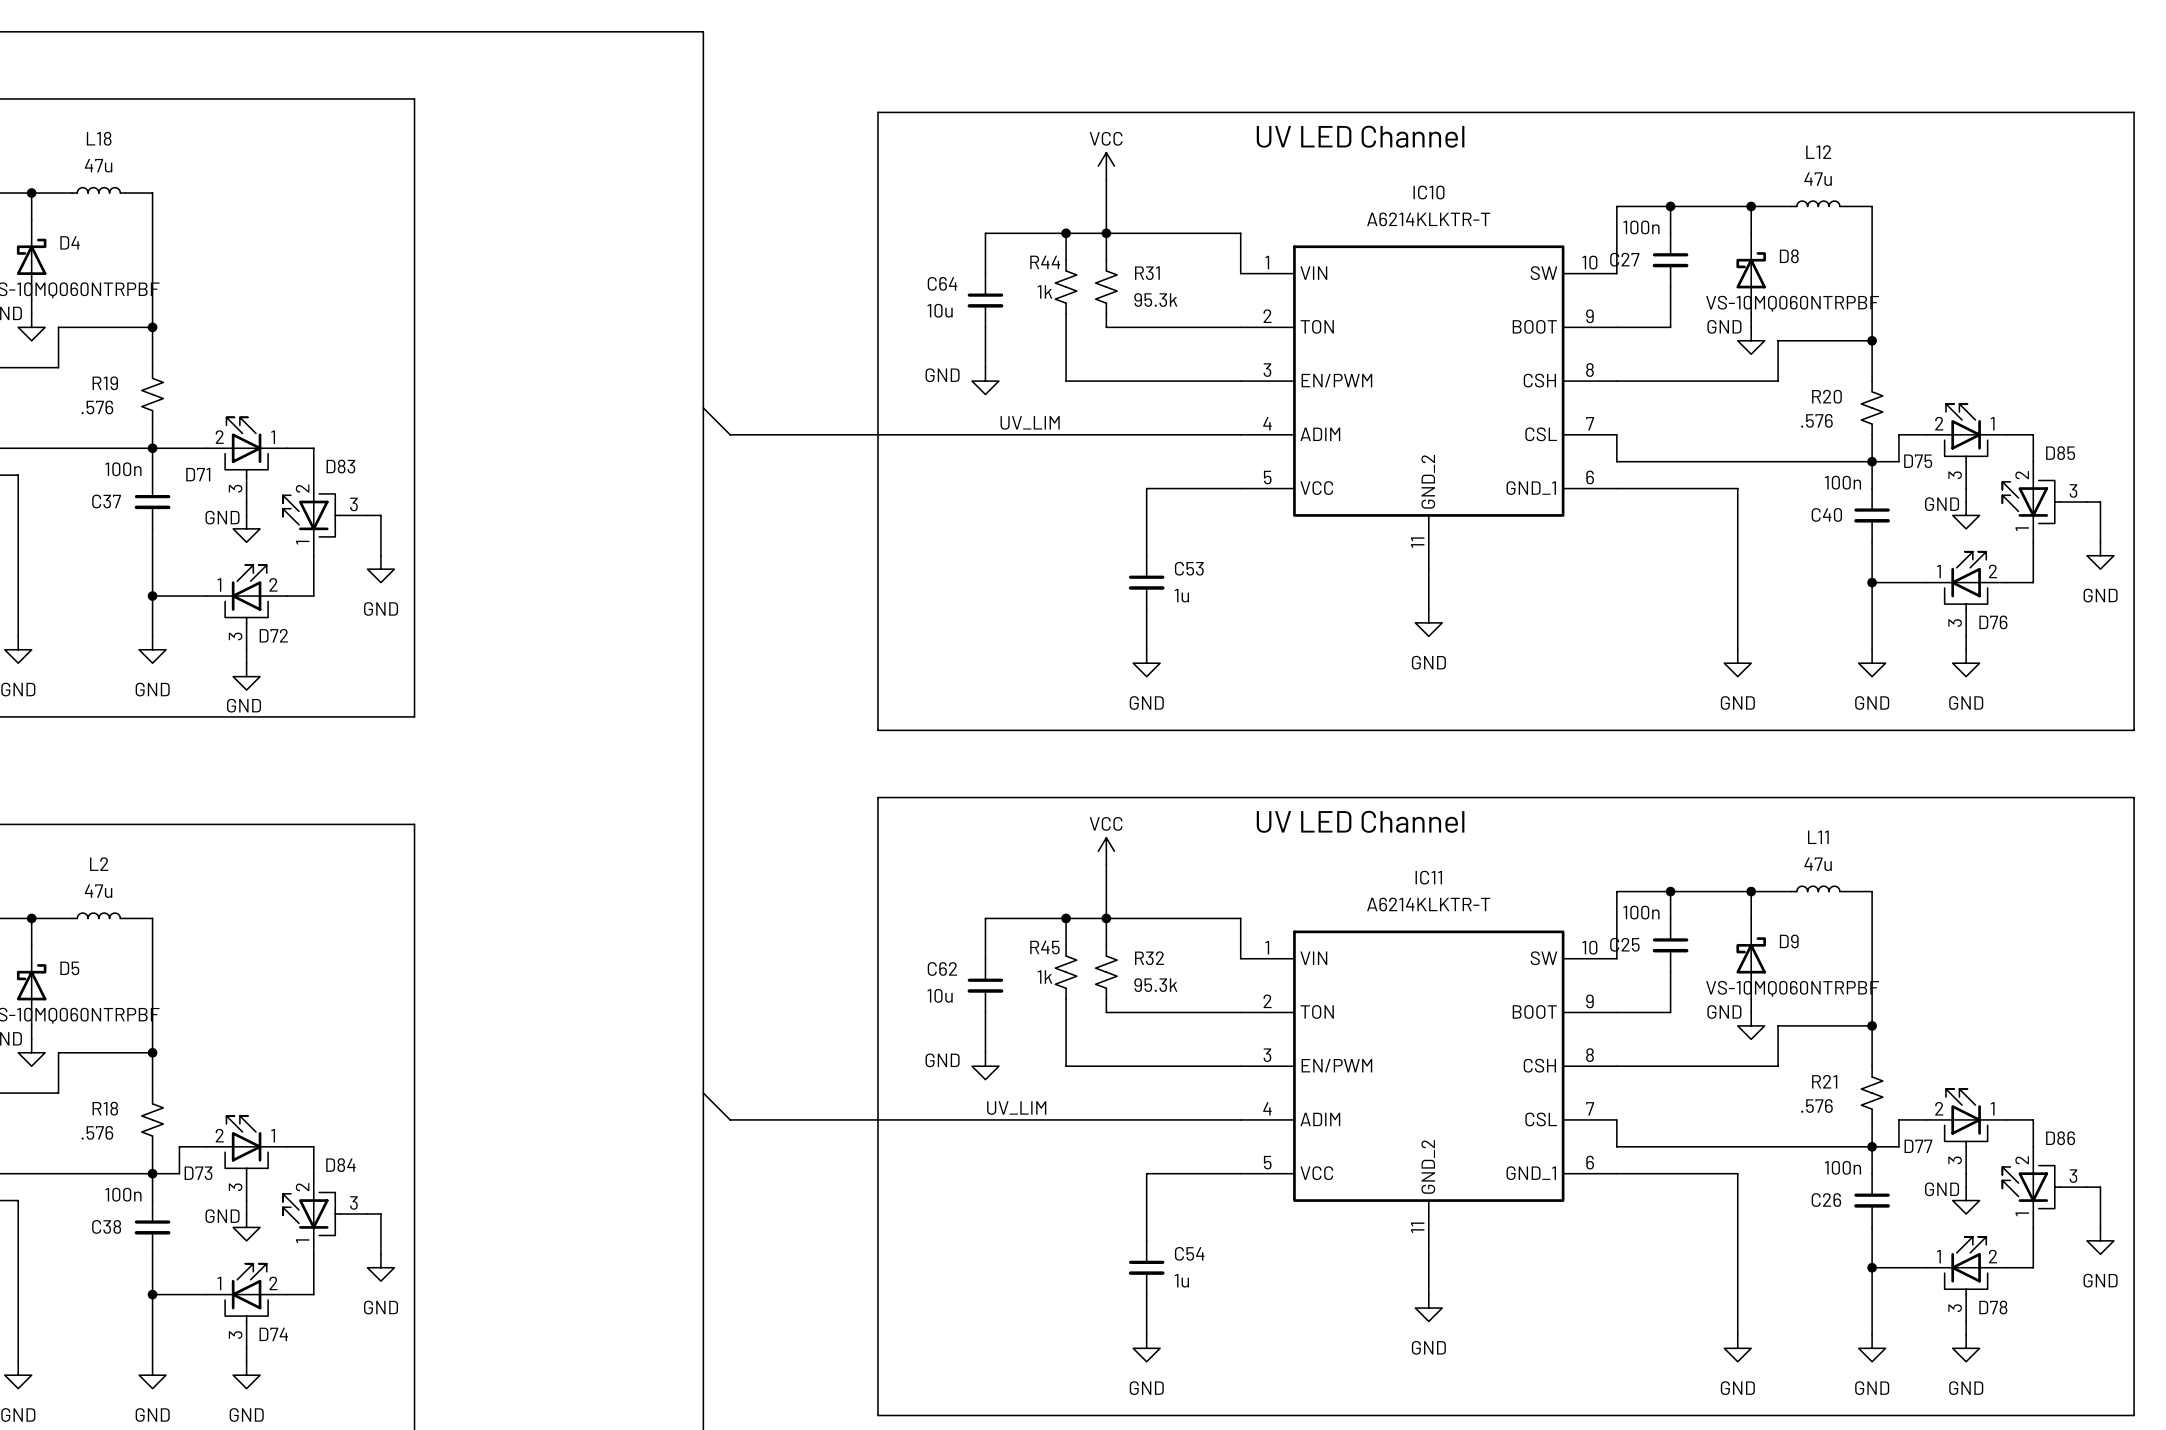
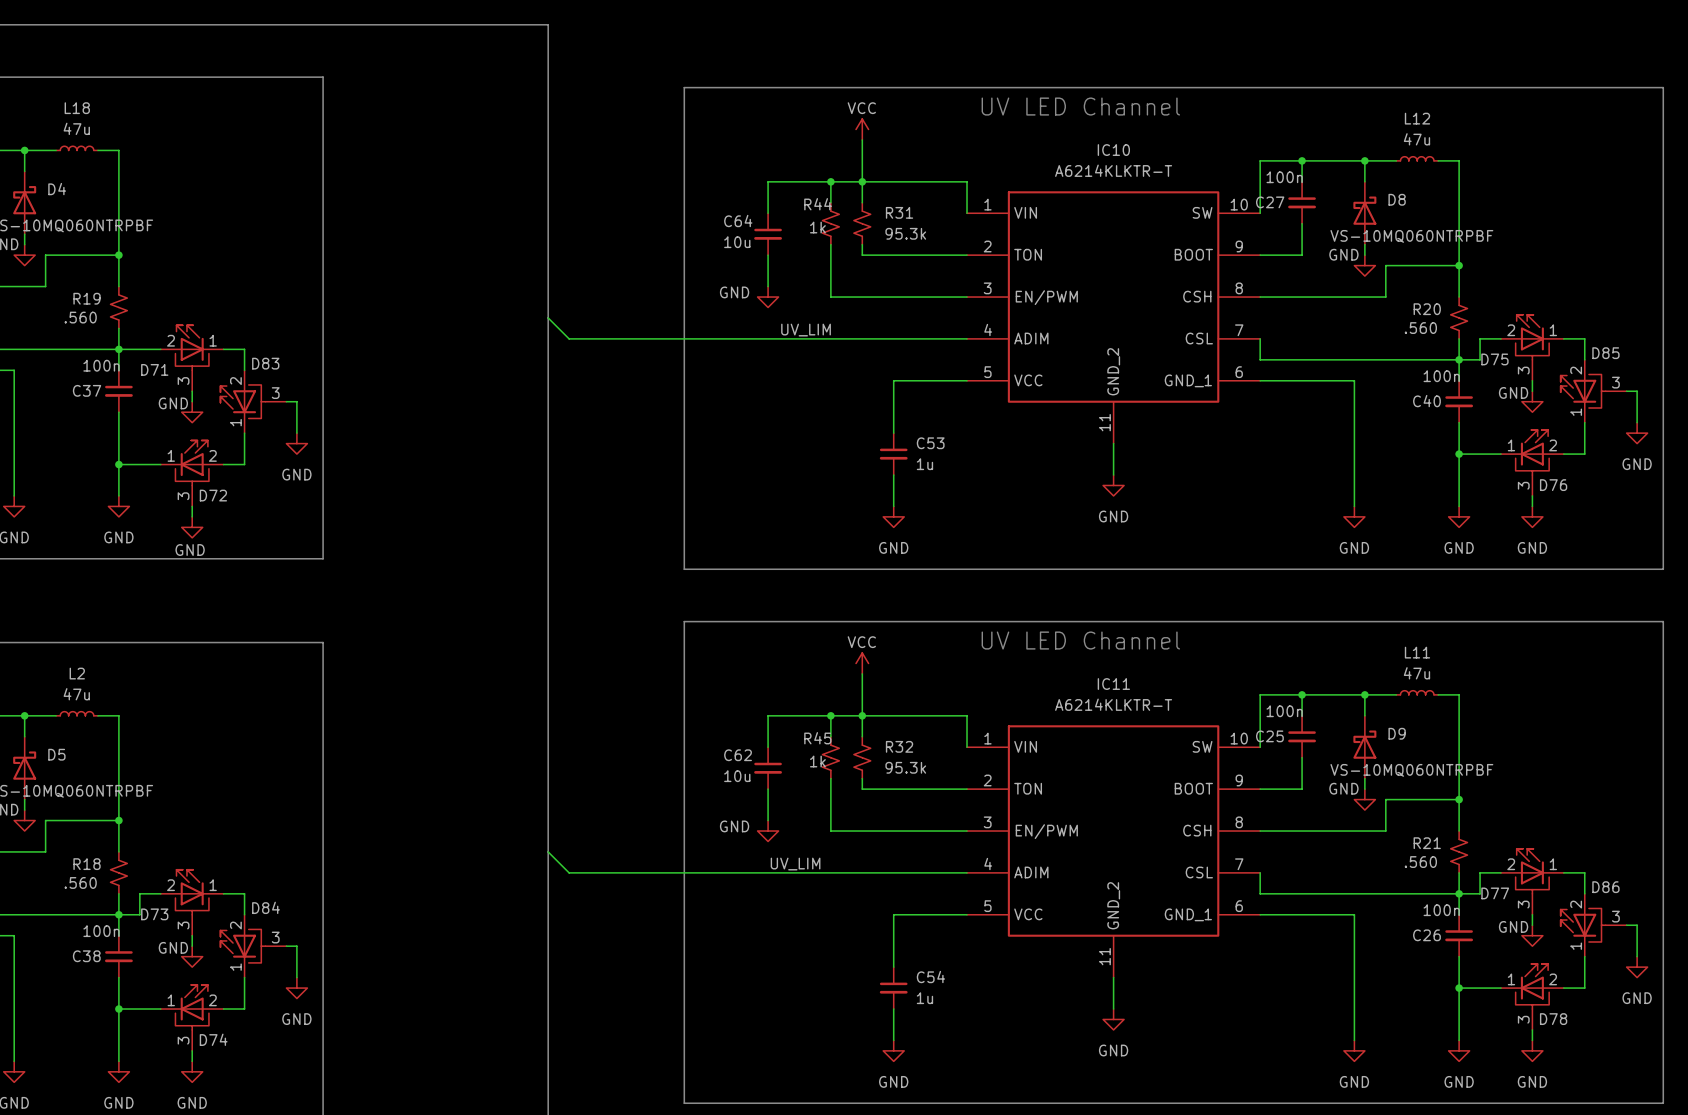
R19 value: .576 (97, 407) -> .560 (80, 317)
R20 value: .576 (1816, 420) -> .560 (1420, 328)
R21 value: .576 (1816, 1106) -> .560 (1420, 862)
R18 value: .576 (97, 1132) -> .560 (80, 882)

